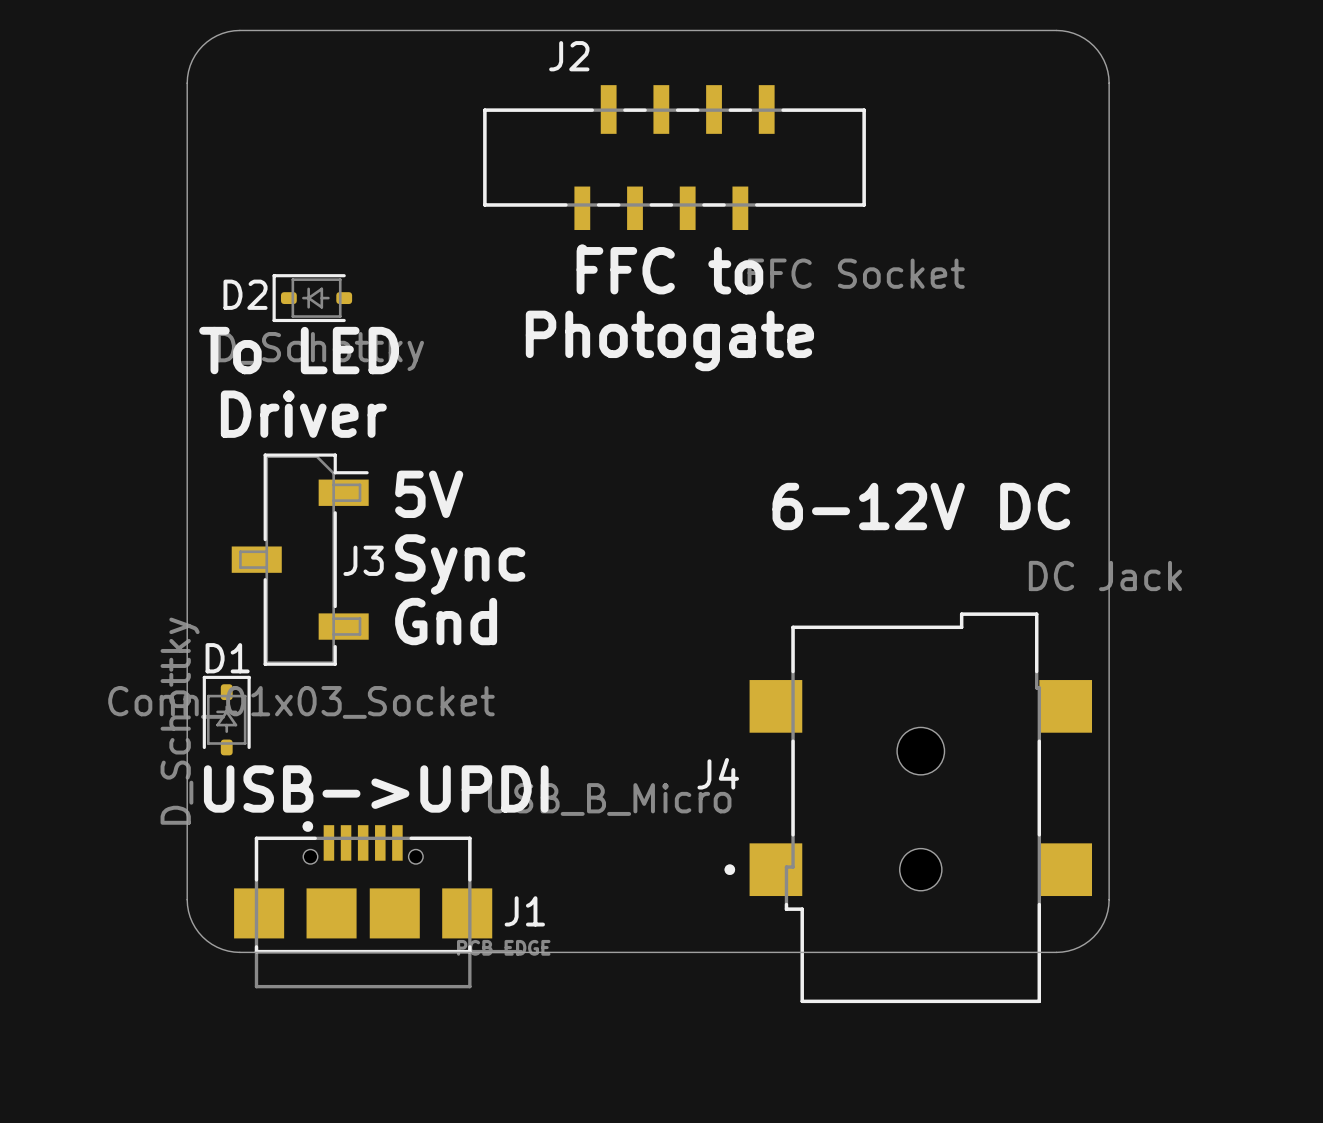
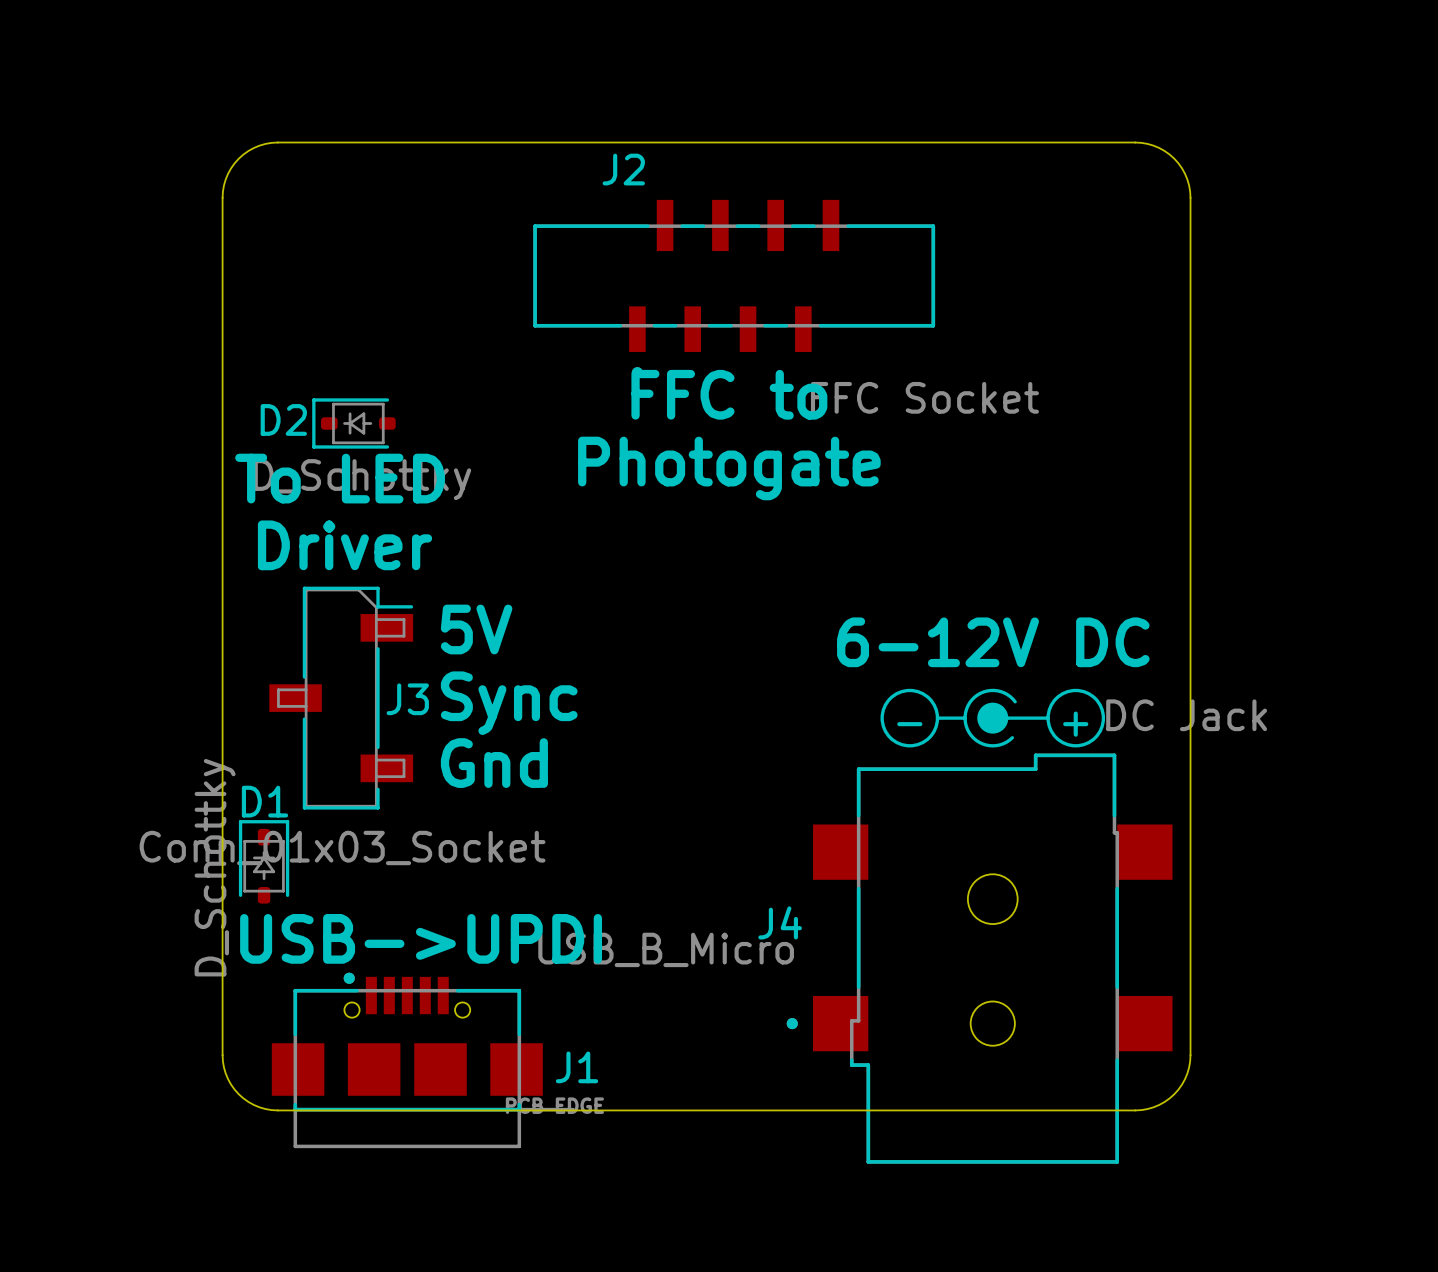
drawing: none -> [880, 688, 1106, 748]

